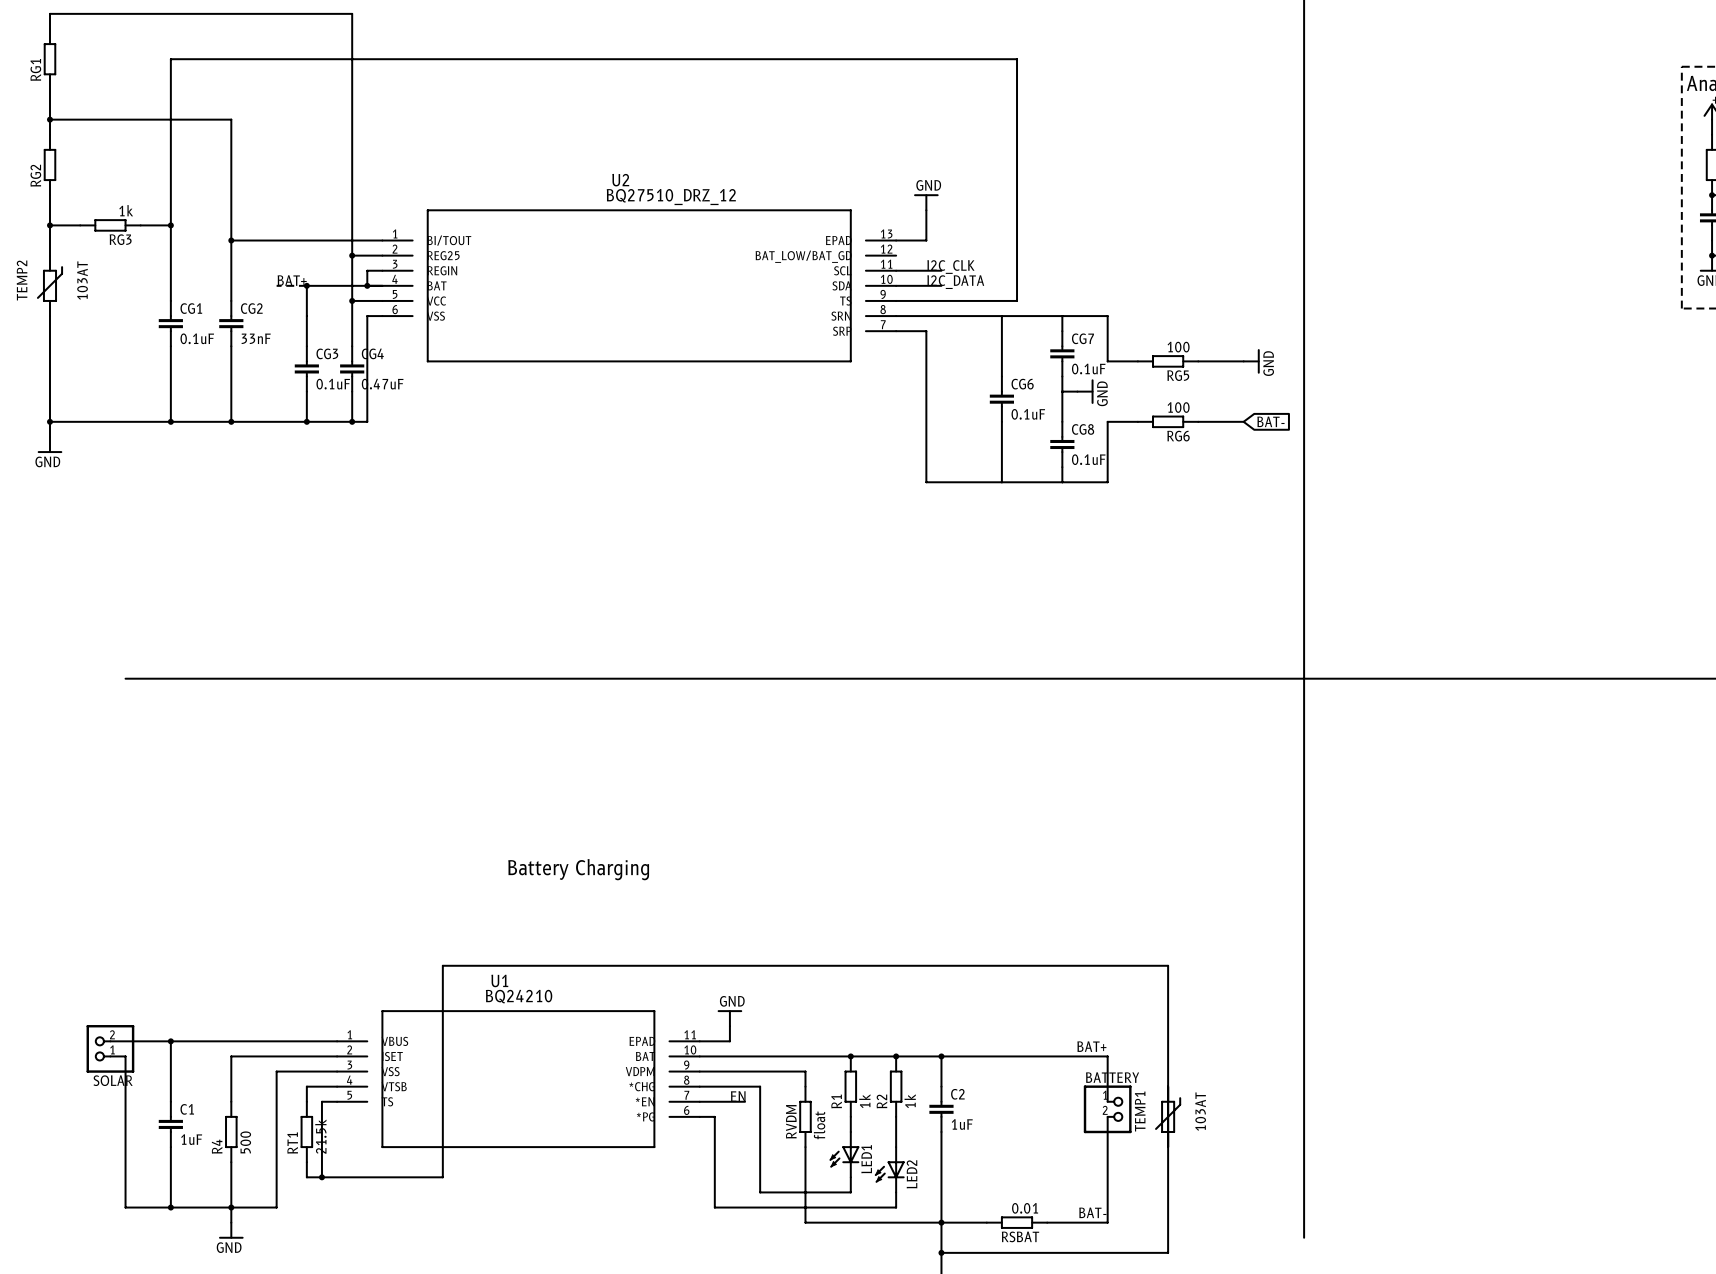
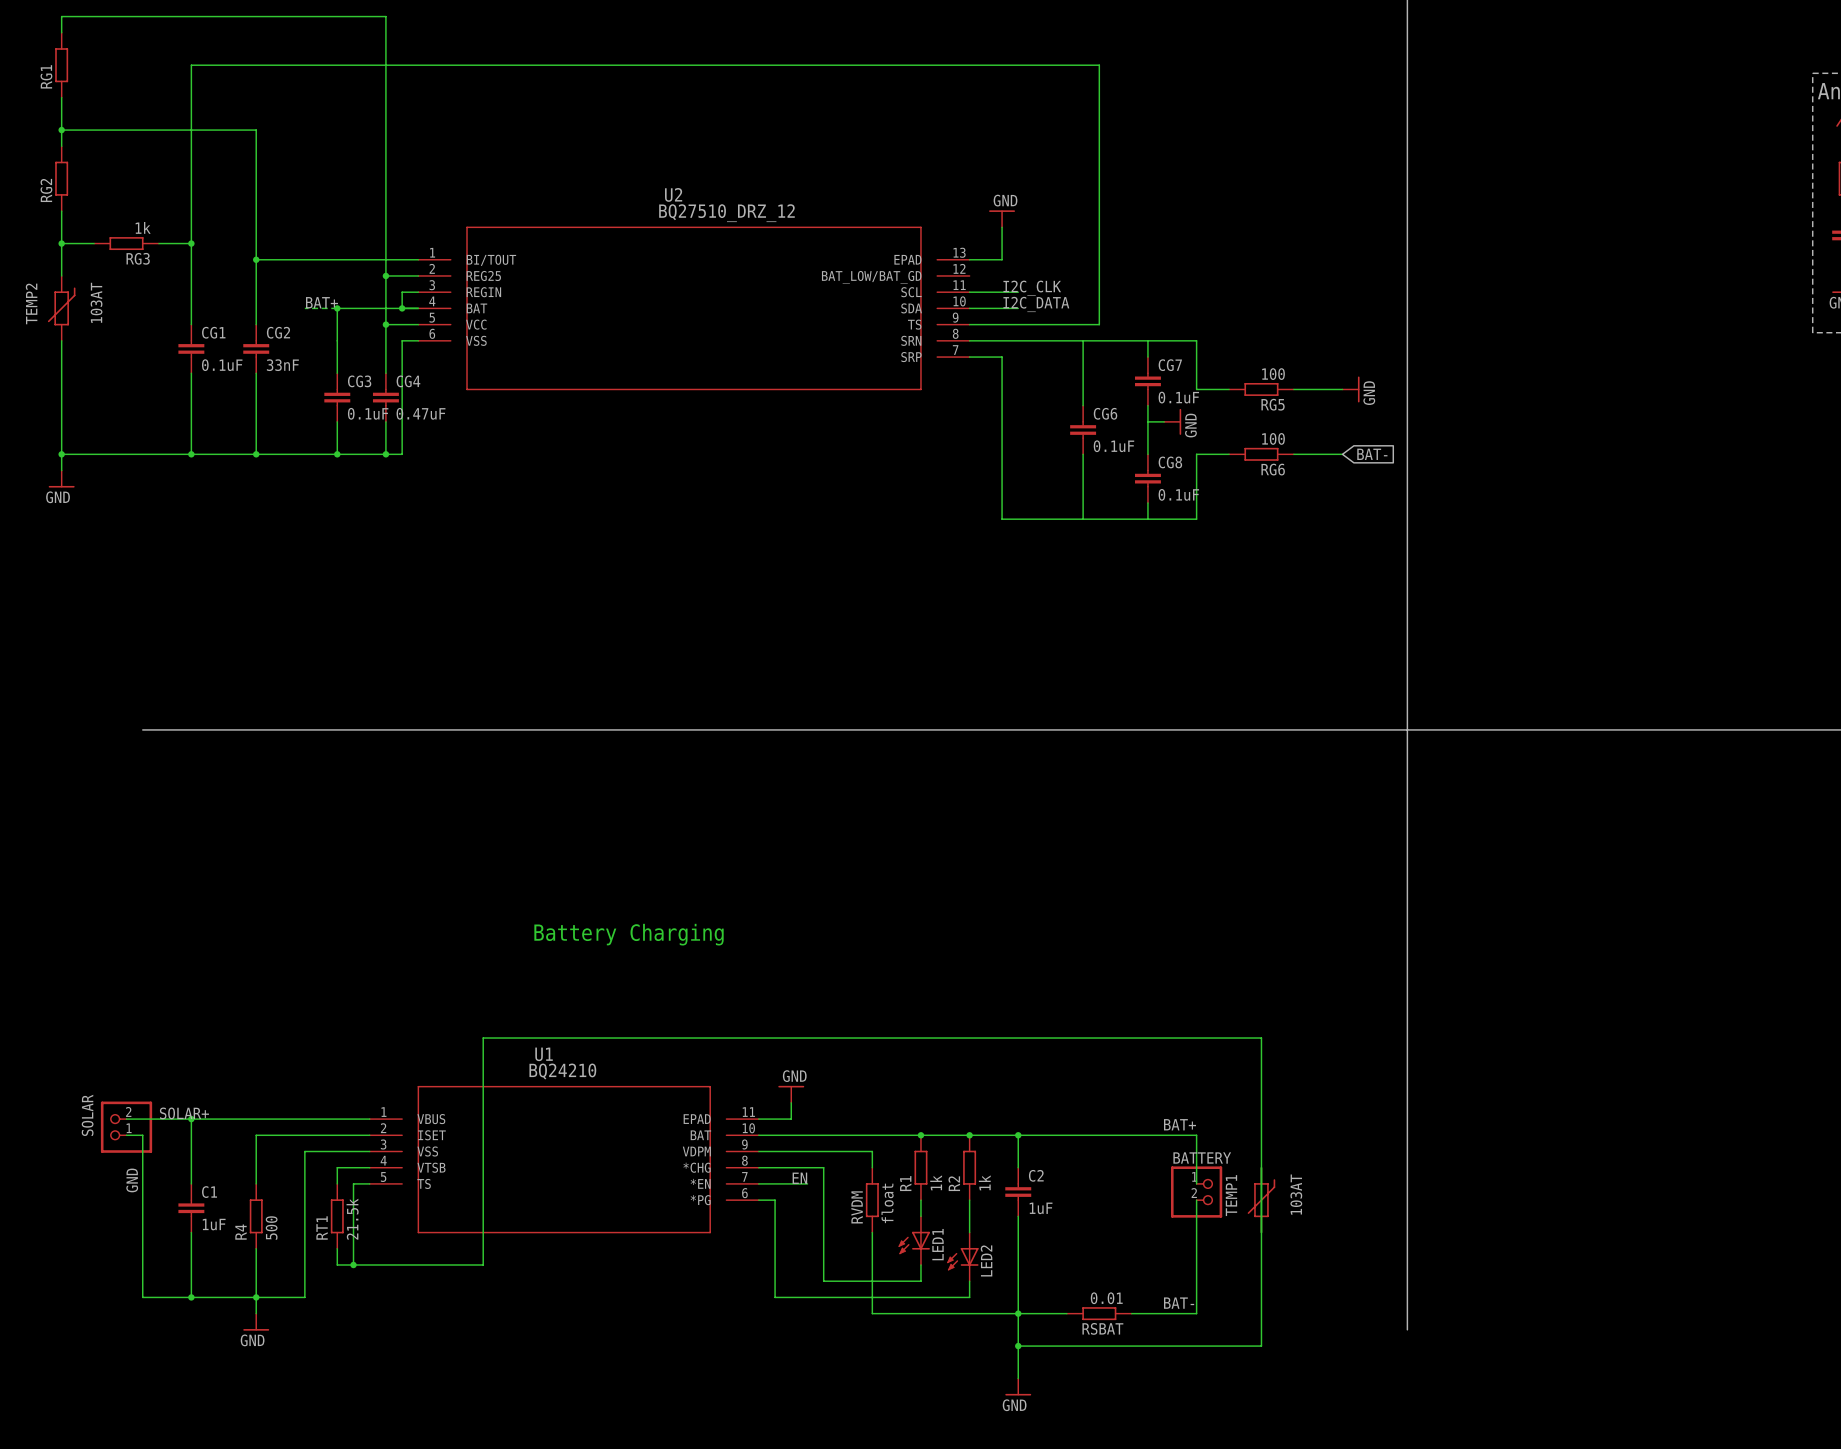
label: none -> SOLAR+ (184, 1113)
SOLAR name rotation: 0° (113, 1080) -> 90° counterclockwise (87, 1115)
label: none -> GND (132, 1180)

